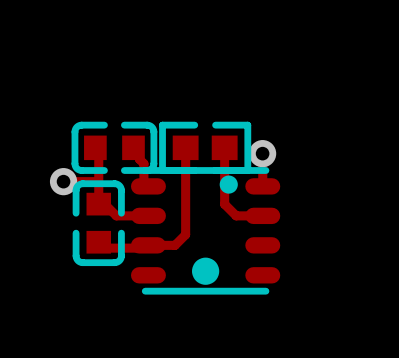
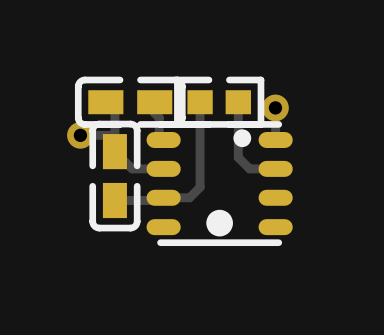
part footprint: [71, 121, 158, 174] -> [74, 76, 186, 128]
part footprint: [72, 180, 125, 267] -> [89, 120, 141, 232]

